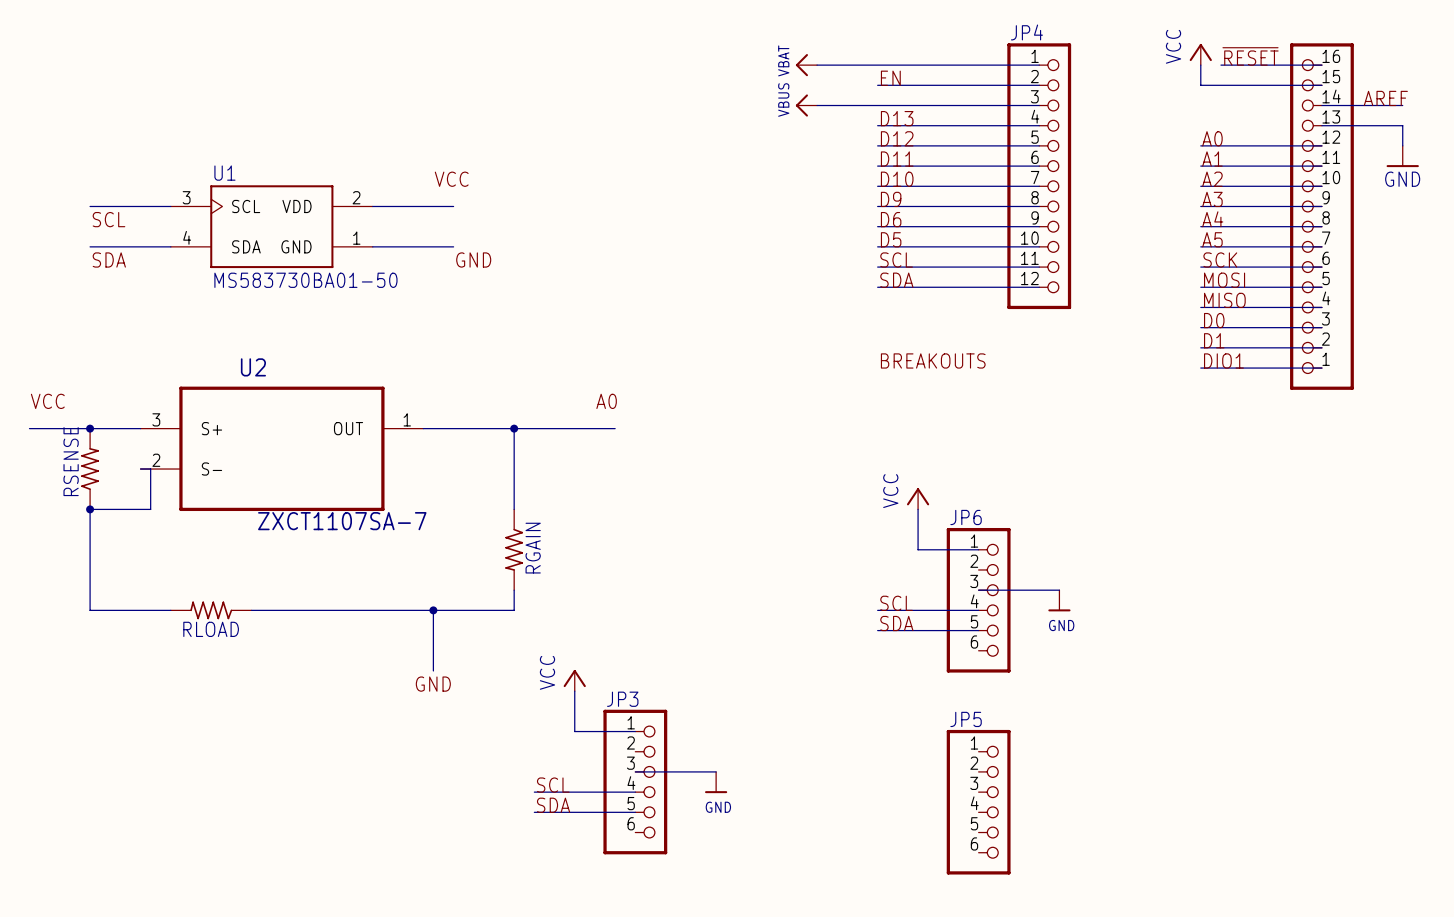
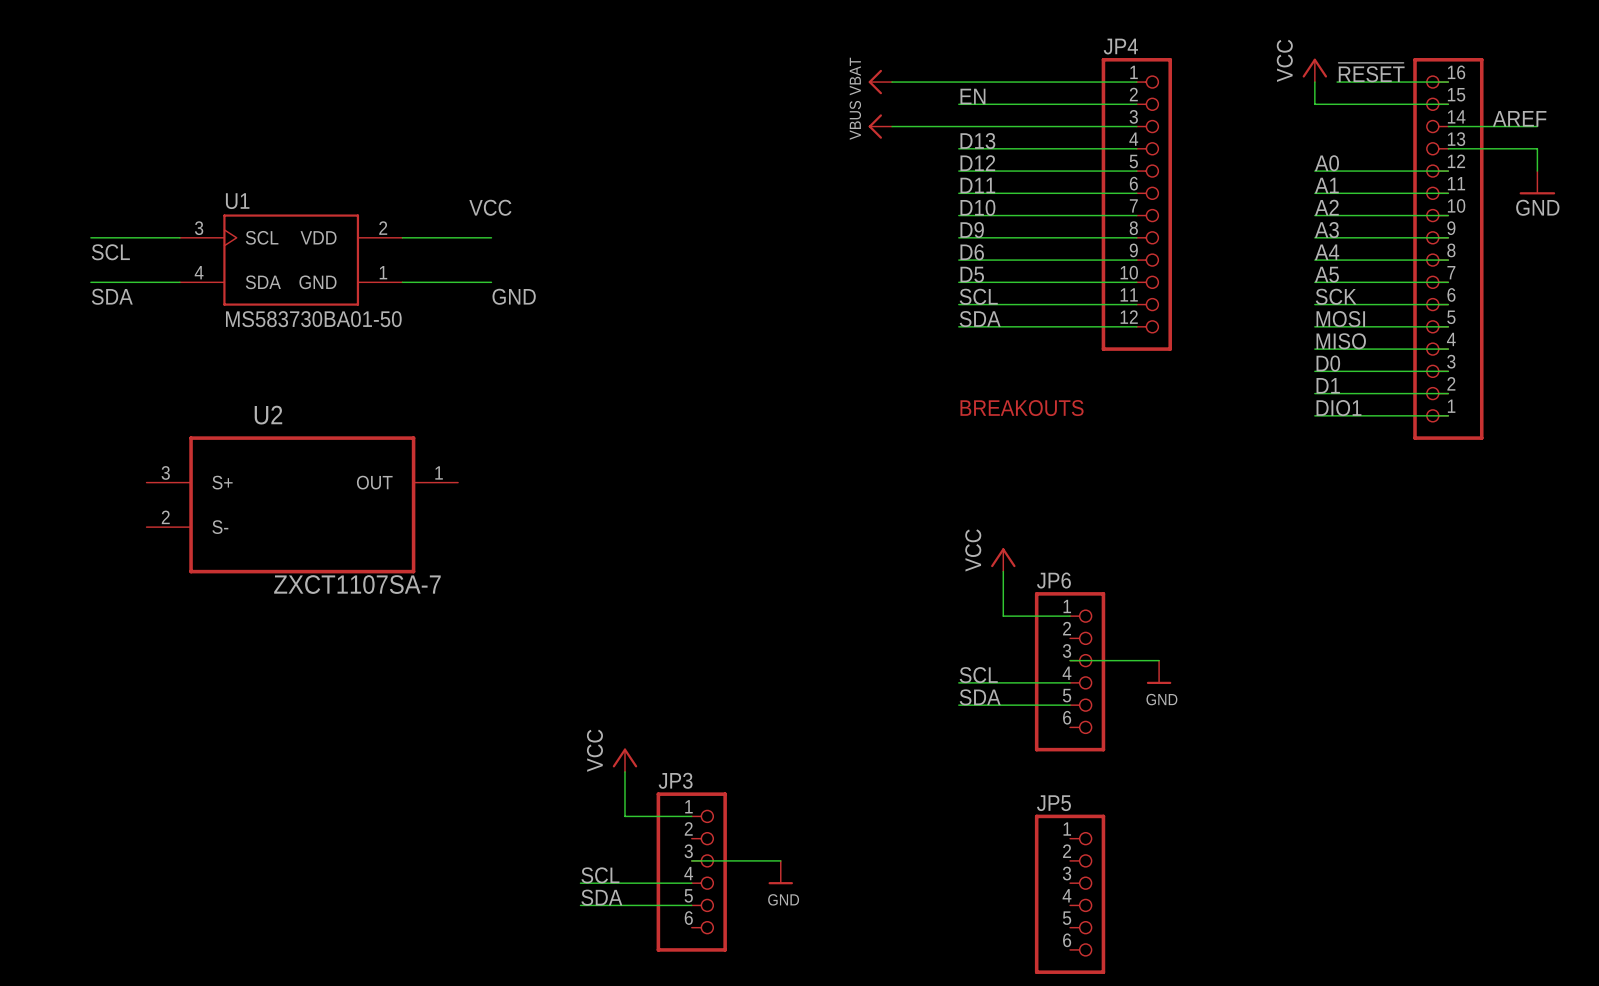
label: VCC (47, 401) -> none
label: A0 (606, 401) -> none
wire: (29, 428) (140, 428) -> none
junction: (90, 428) -> none
wire: (423, 428) (615, 428) -> none
wire: (514, 428) (514, 509) -> none
junction: (514, 428) -> none
RSENSE: (90, 469) -> none
wire: (140, 469) (150, 469) (150, 509) (90, 509) (90, 610) (170, 610) -> none
junction: (90, 509) -> none
RGAIN: (514, 549) -> none
wire: (514, 590) (514, 610) (251, 610) -> none
RLOAD: (211, 610) -> none
wire: (433, 610) (433, 670) -> none
junction: (433, 610) -> none
label: GND (433, 684) -> none

